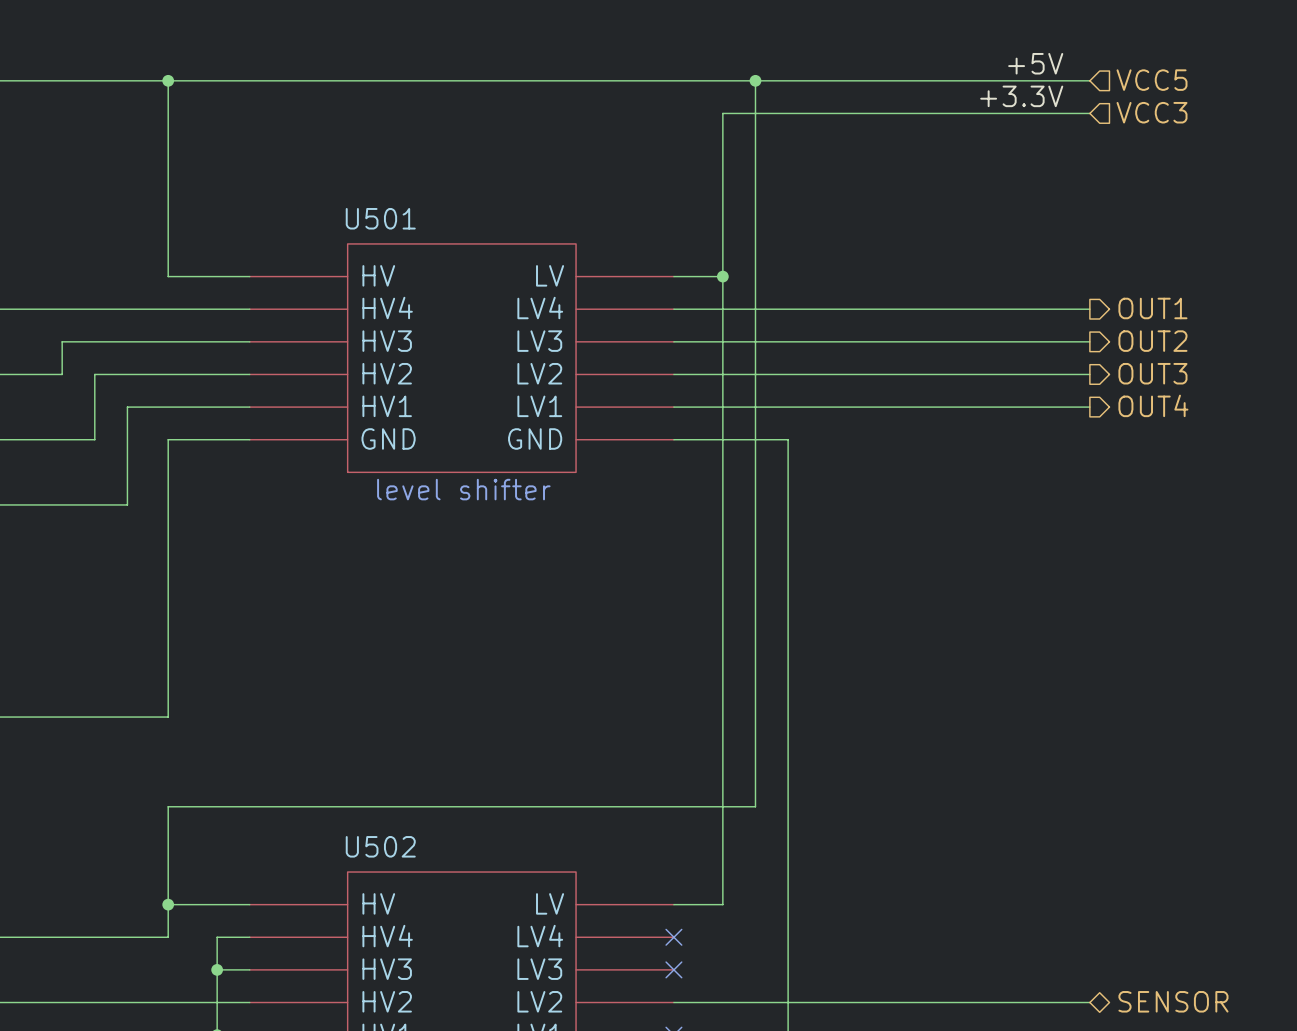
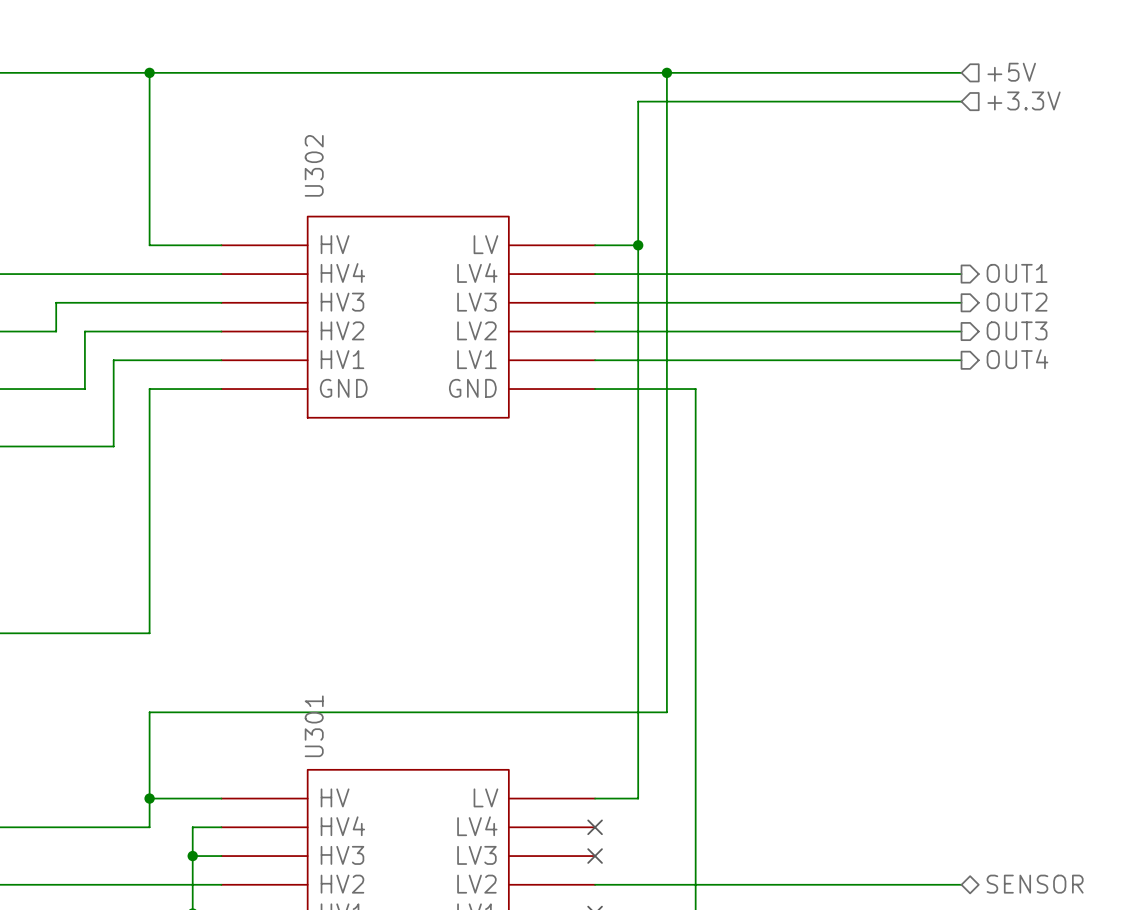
label: +5V (1035, 63) -> none
hierarchical label: VCC5 (1152, 80) -> +5V (1011, 72)
label: +3.3V (1021, 96) -> none
hierarchical label: VCC3 (1152, 112) -> +3.3V (1024, 100)
U501 name: U501 (380, 218) -> U302 (314, 165)
text: level shifter (463, 489) -> none
U502 name: U502 (380, 846) -> U301 (314, 726)

